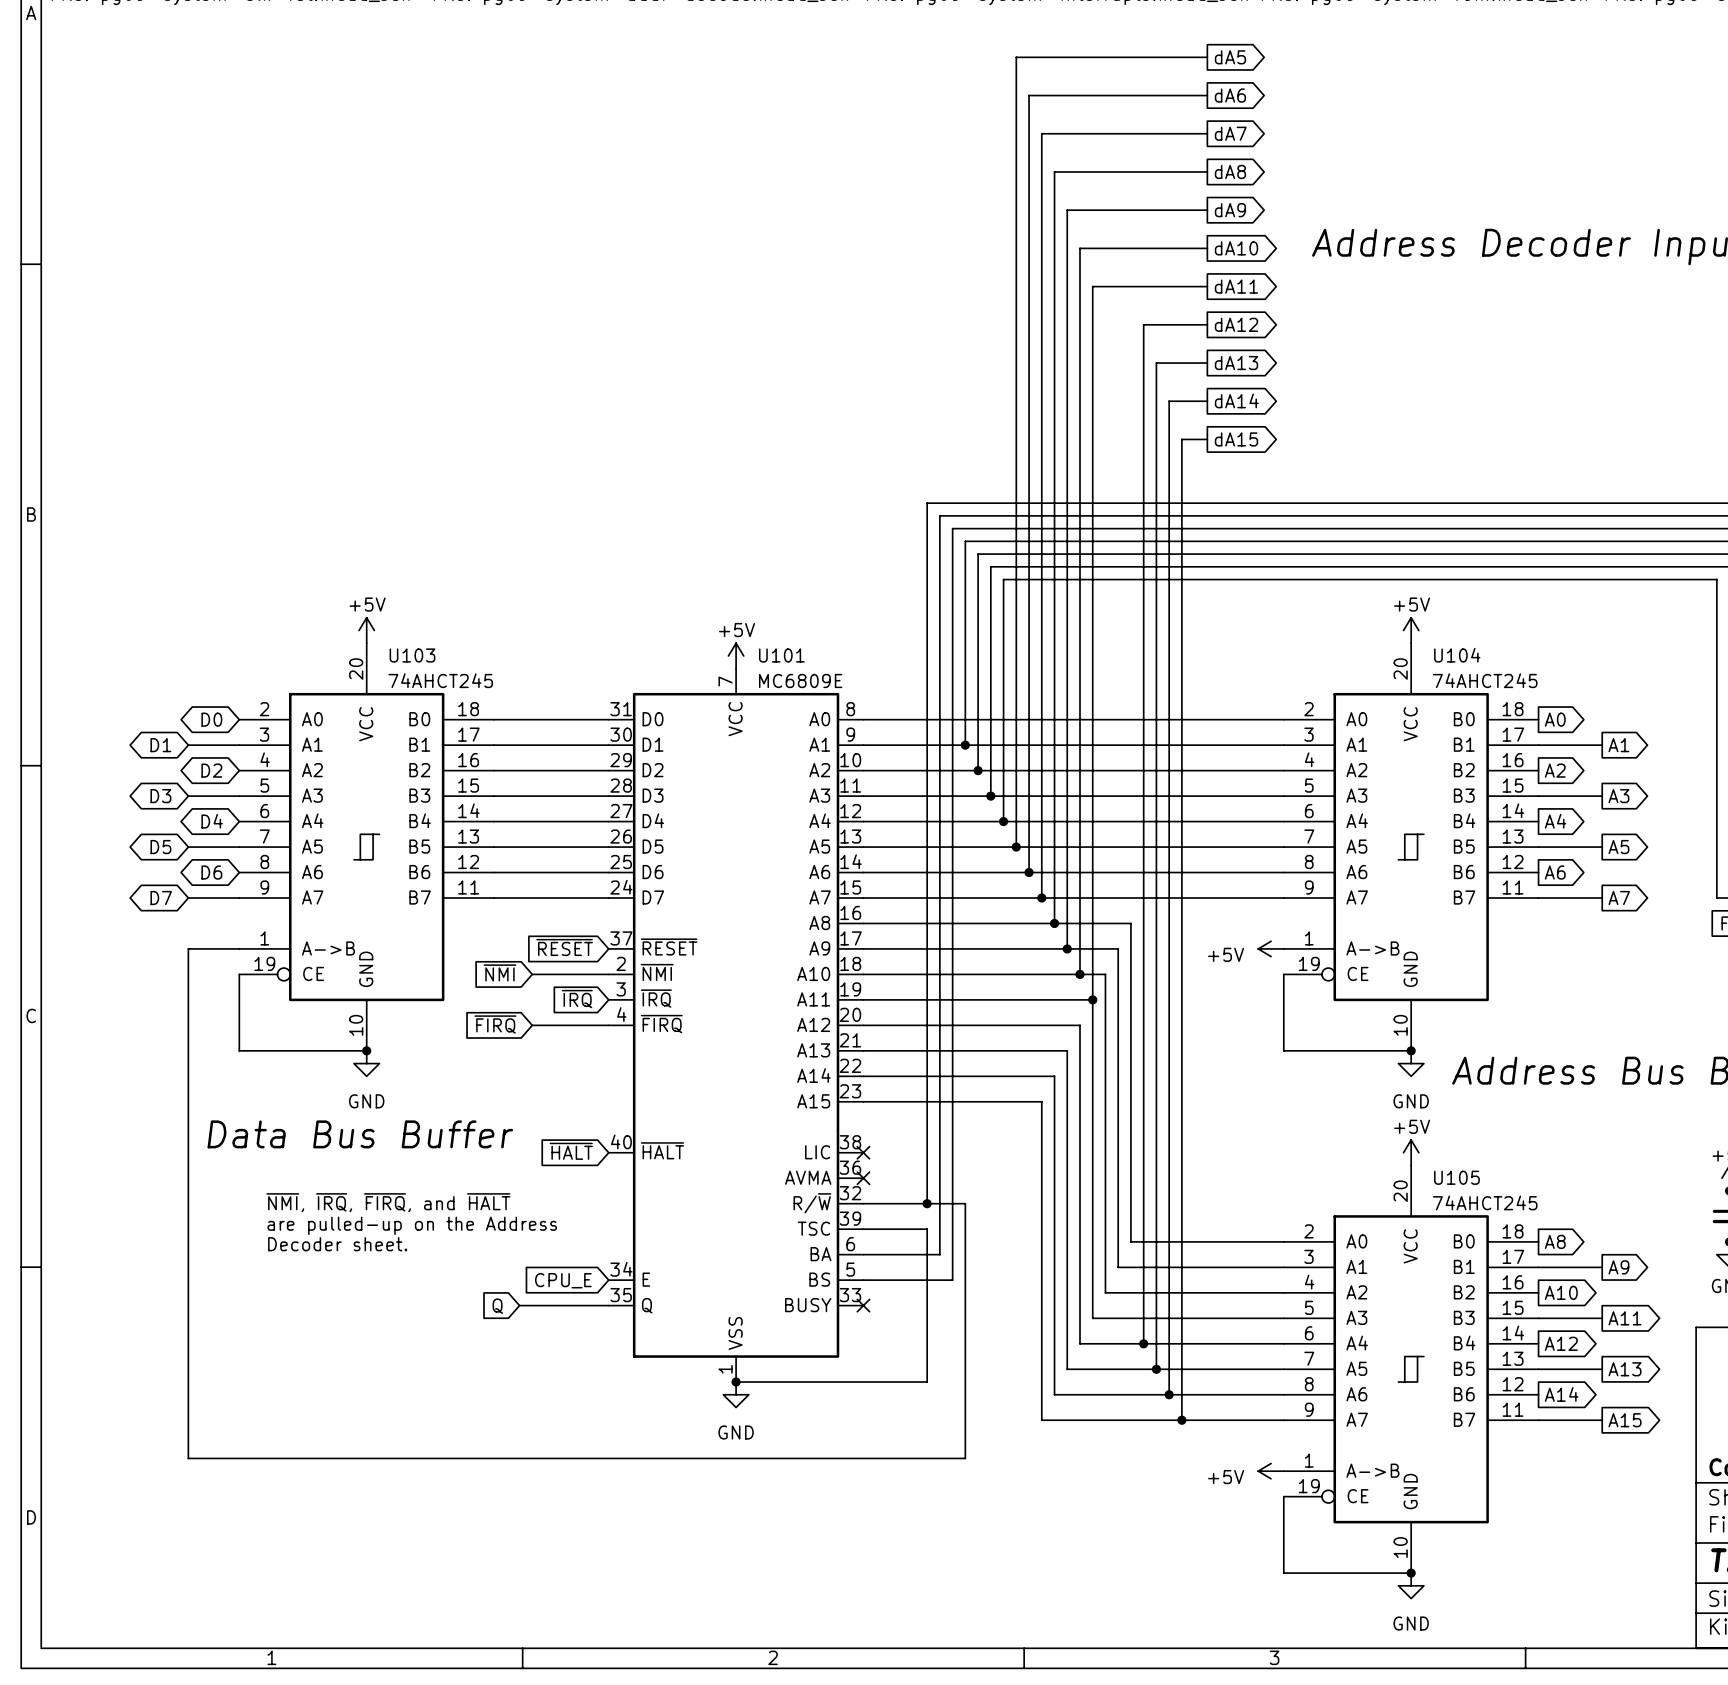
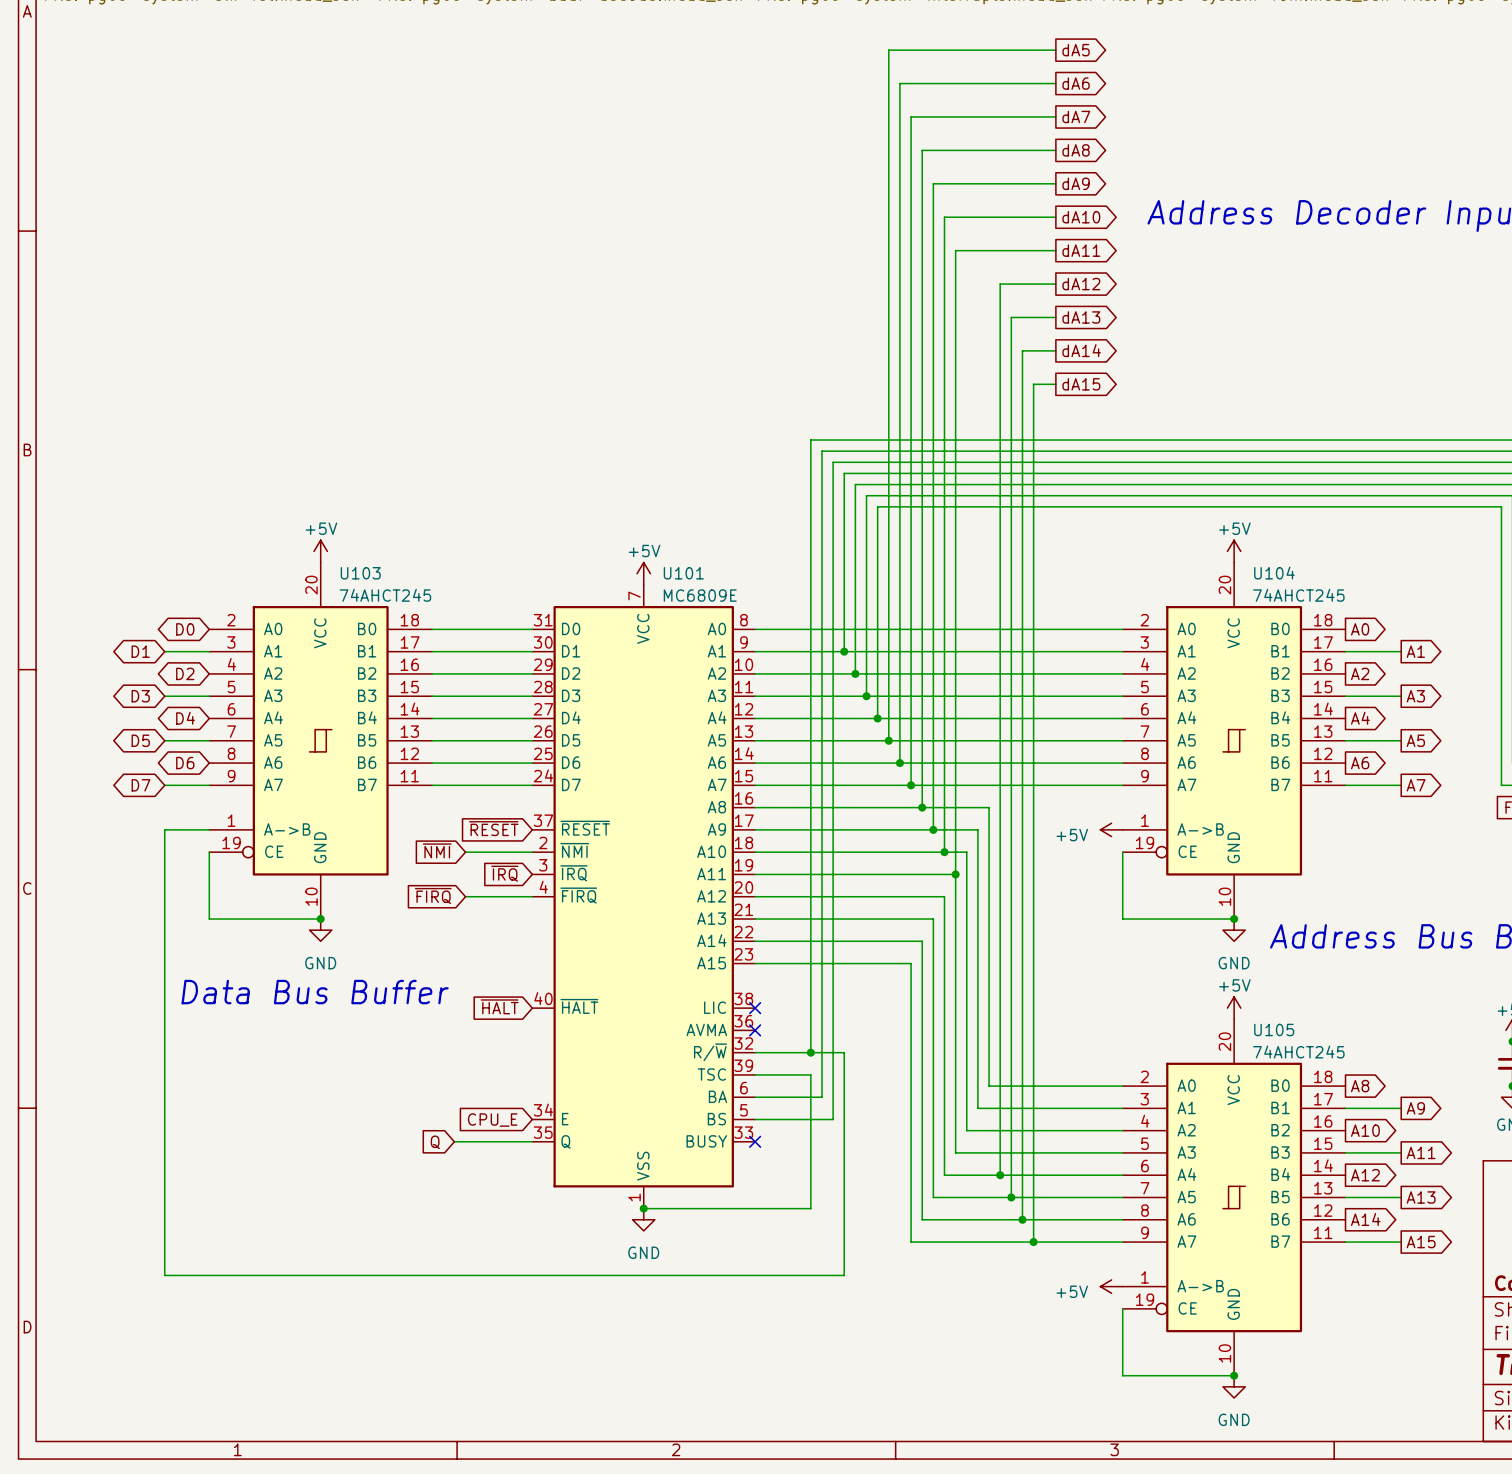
text: ~{NMI}, ~{IRQ}, ~{FIRQ}, and ~{HALT} (388, 1202) -> none
text: are pulled-up on the Address (412, 1225) -> none
text: Decoder sheet. (337, 1244) -> none

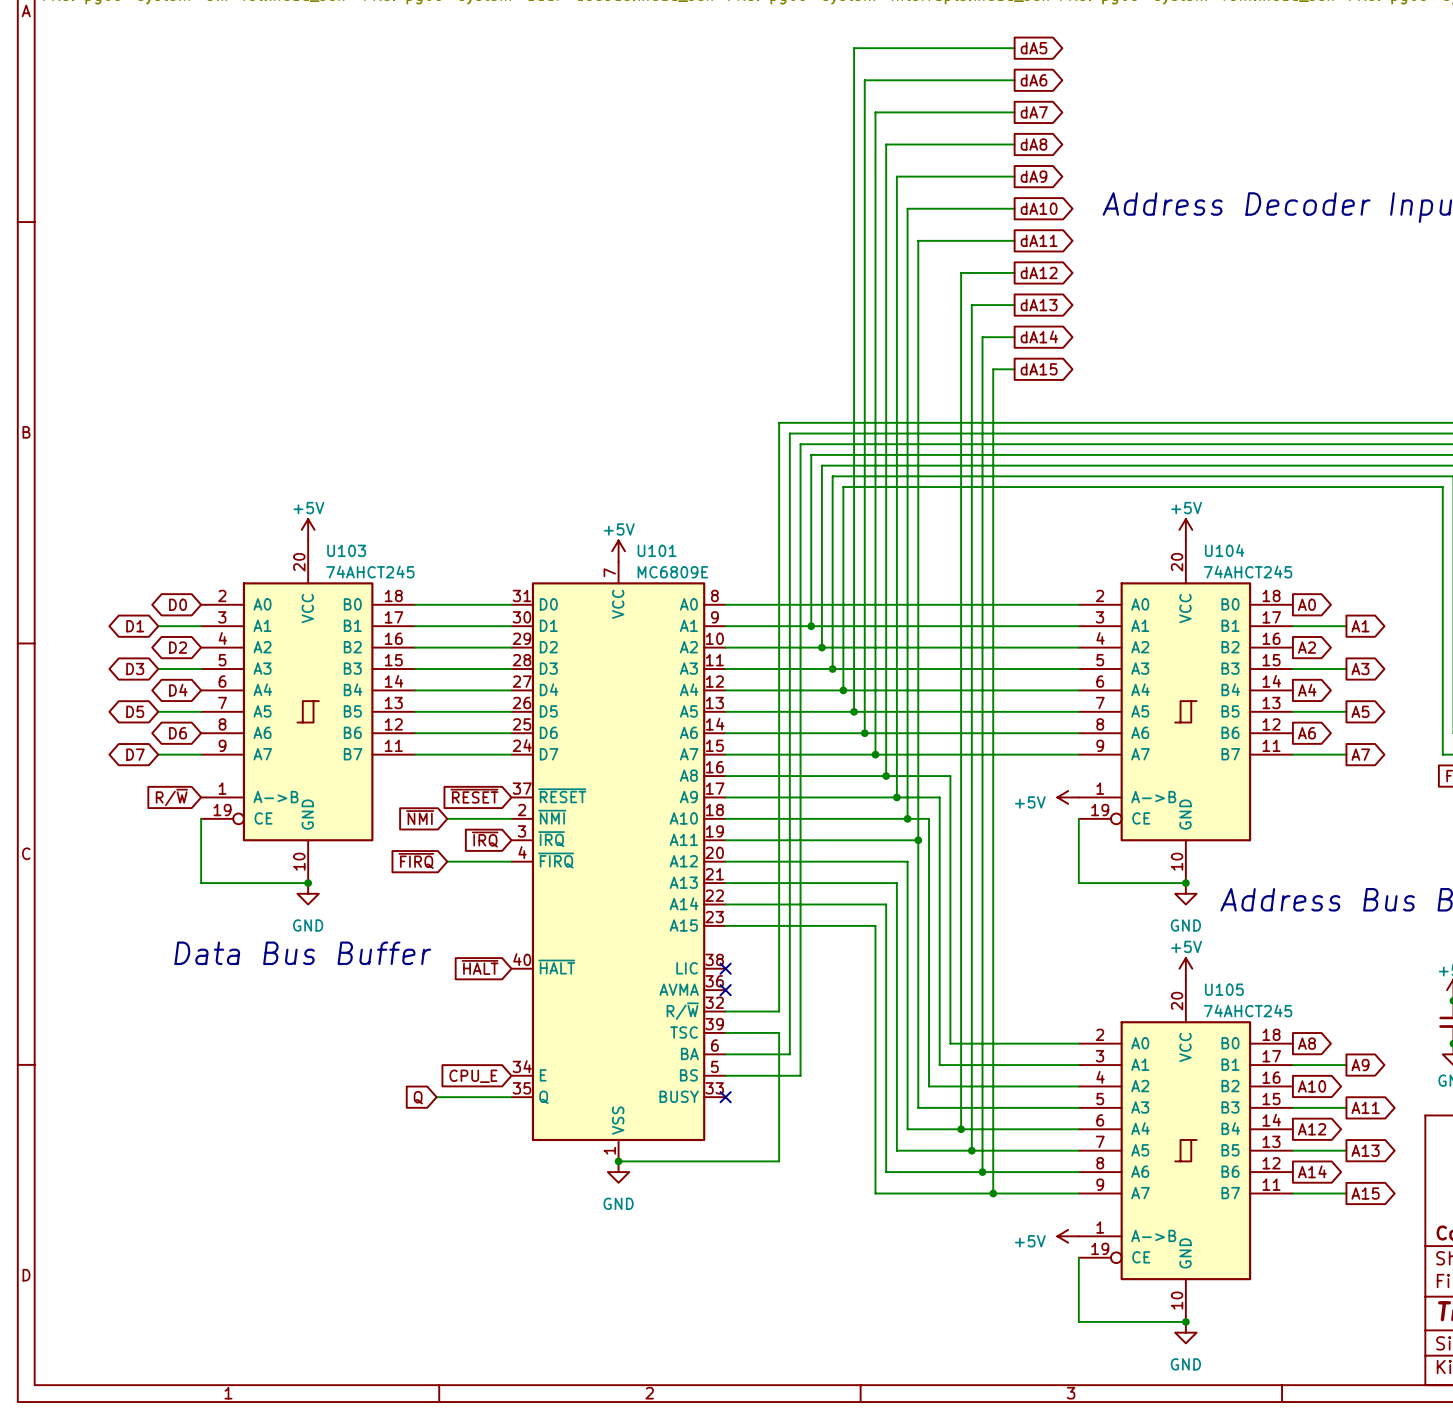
global label: none -> R/~{W} (171, 797)
wire: (209, 829) (164, 829) (164, 1275) (844, 1275) (844, 1052) (810, 1052) -> none
junction: (810, 1052) -> none

